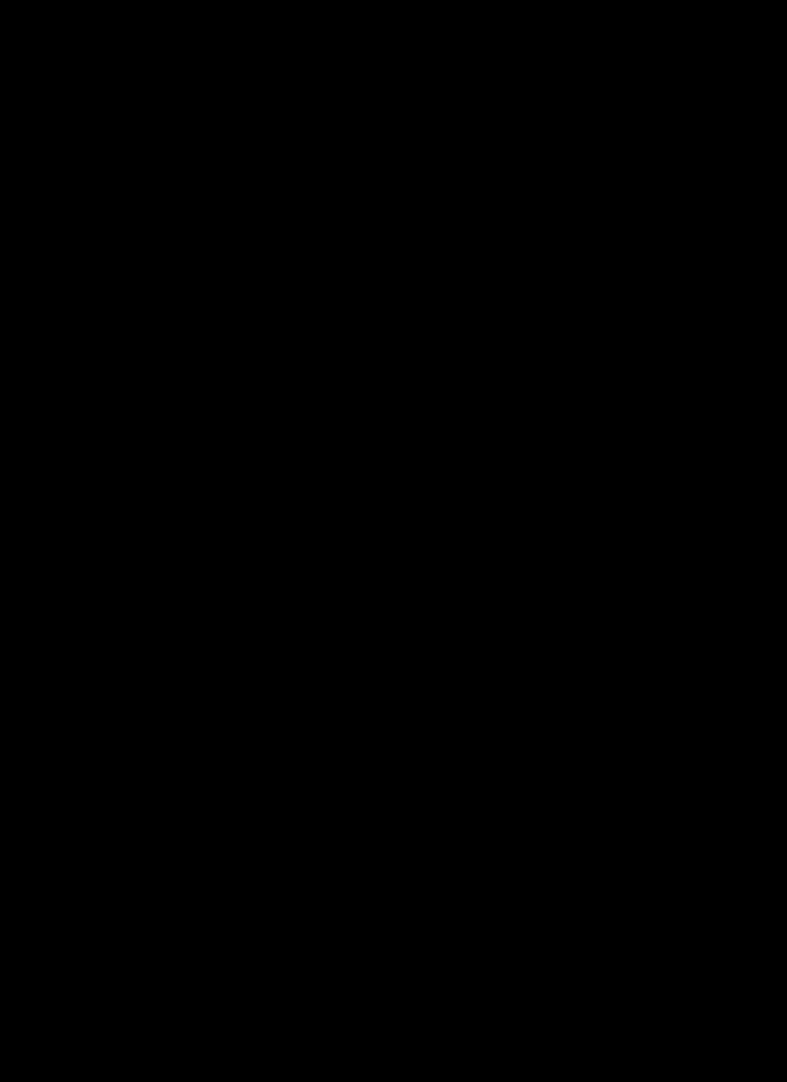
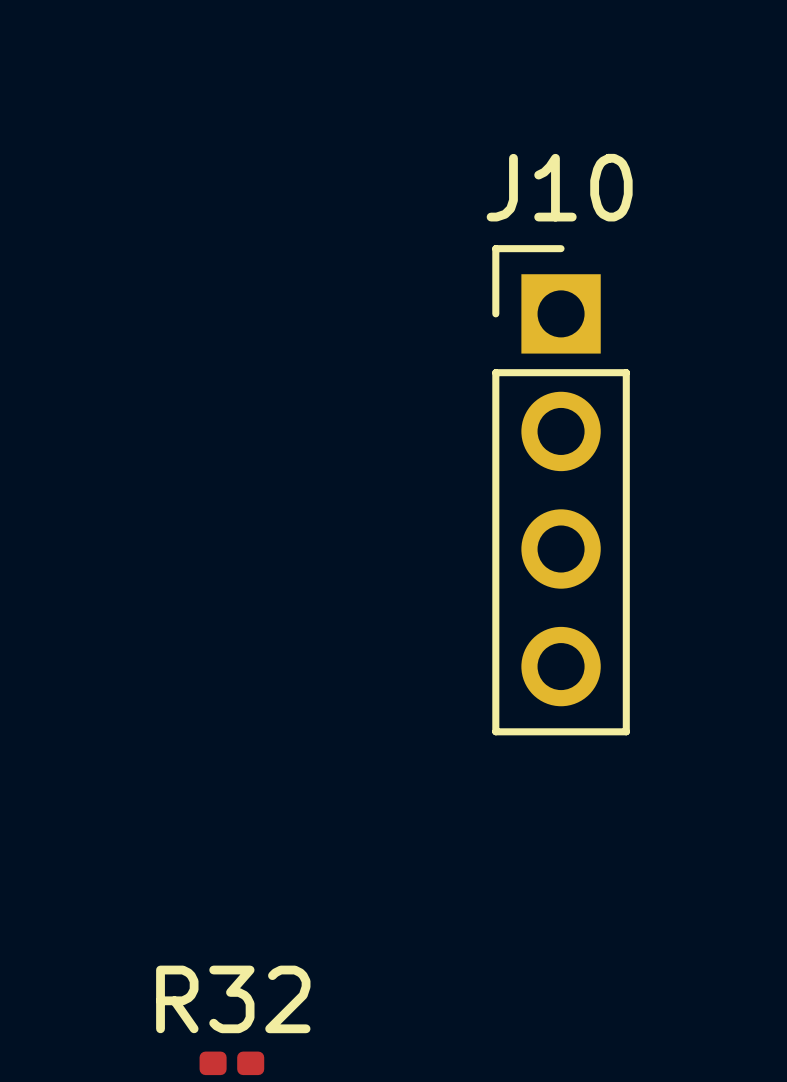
J10: none -> (561, 490)
R32: none -> (231, 1063)

